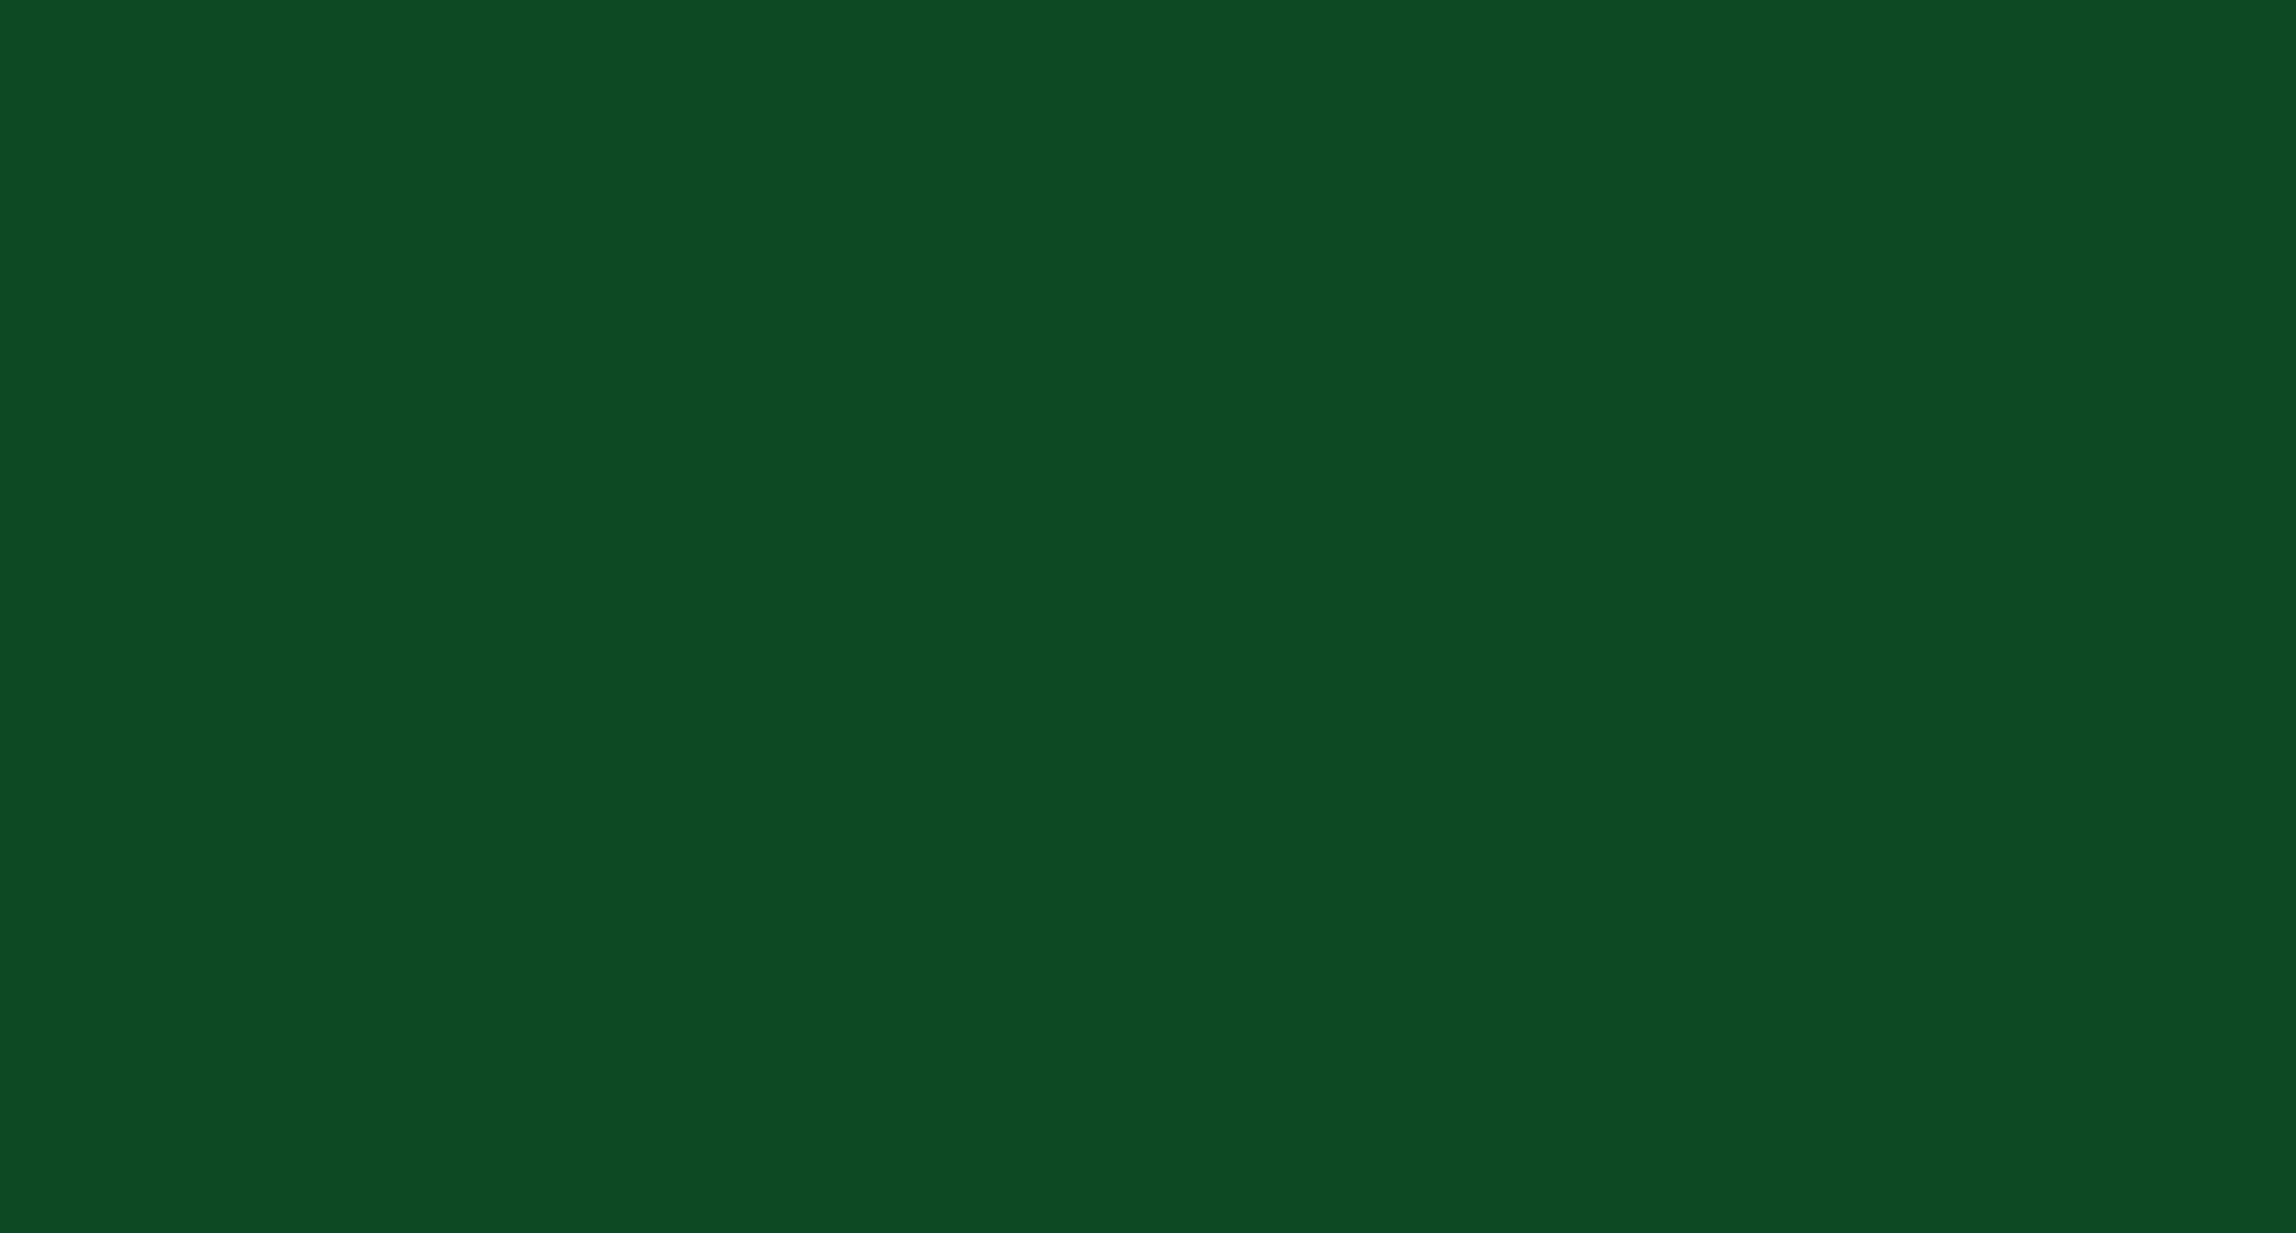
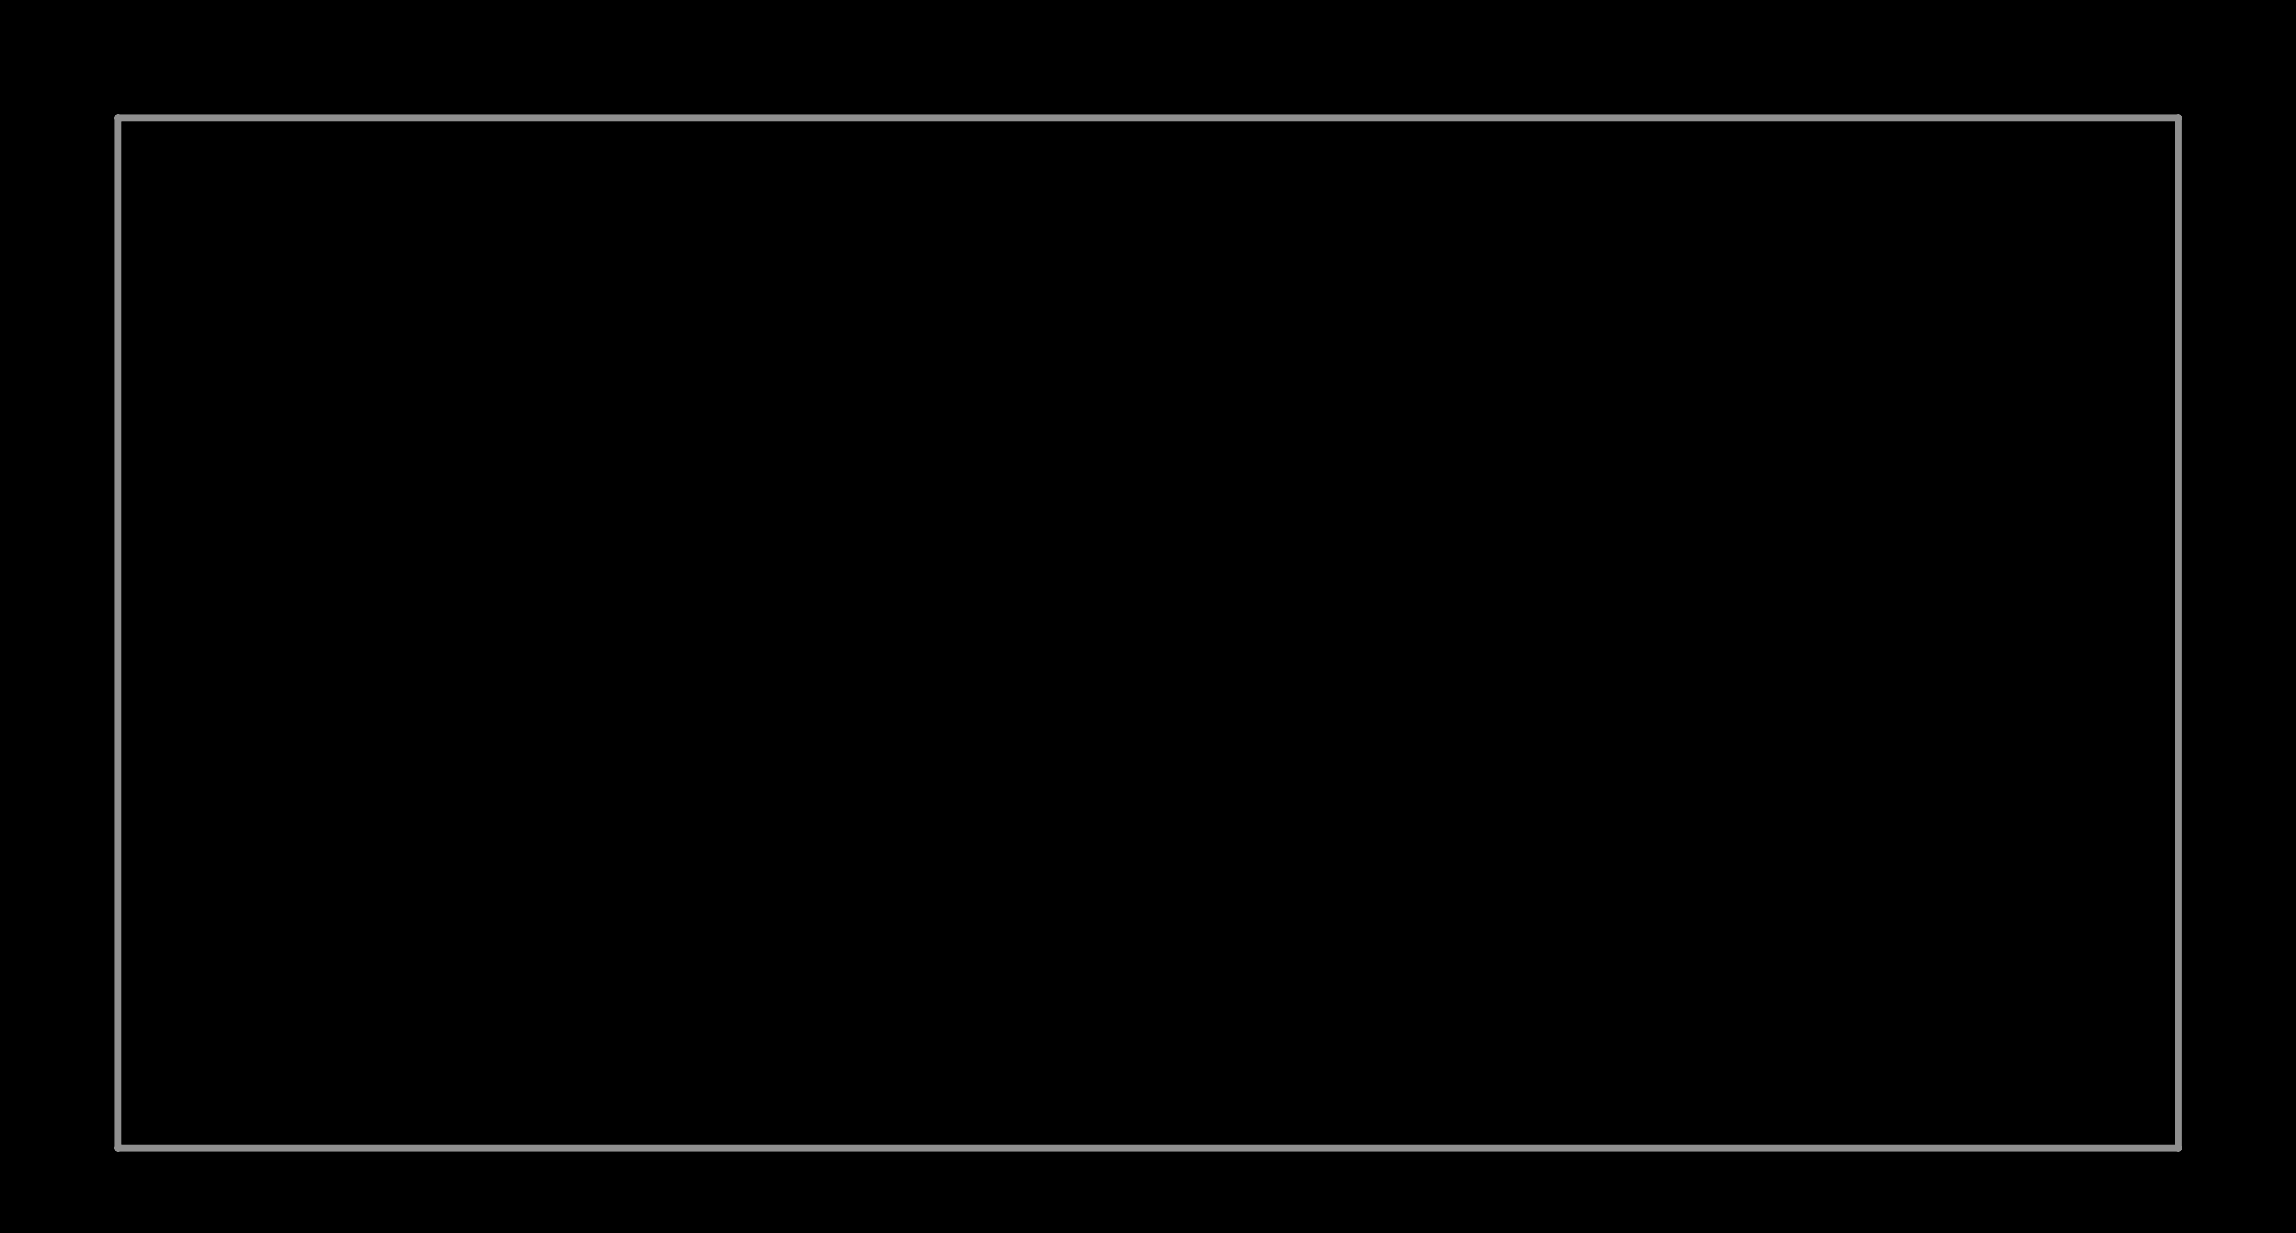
line: none -> (117, 117) (2178, 117) (2178, 1148) (117, 1148) (117, 117)

